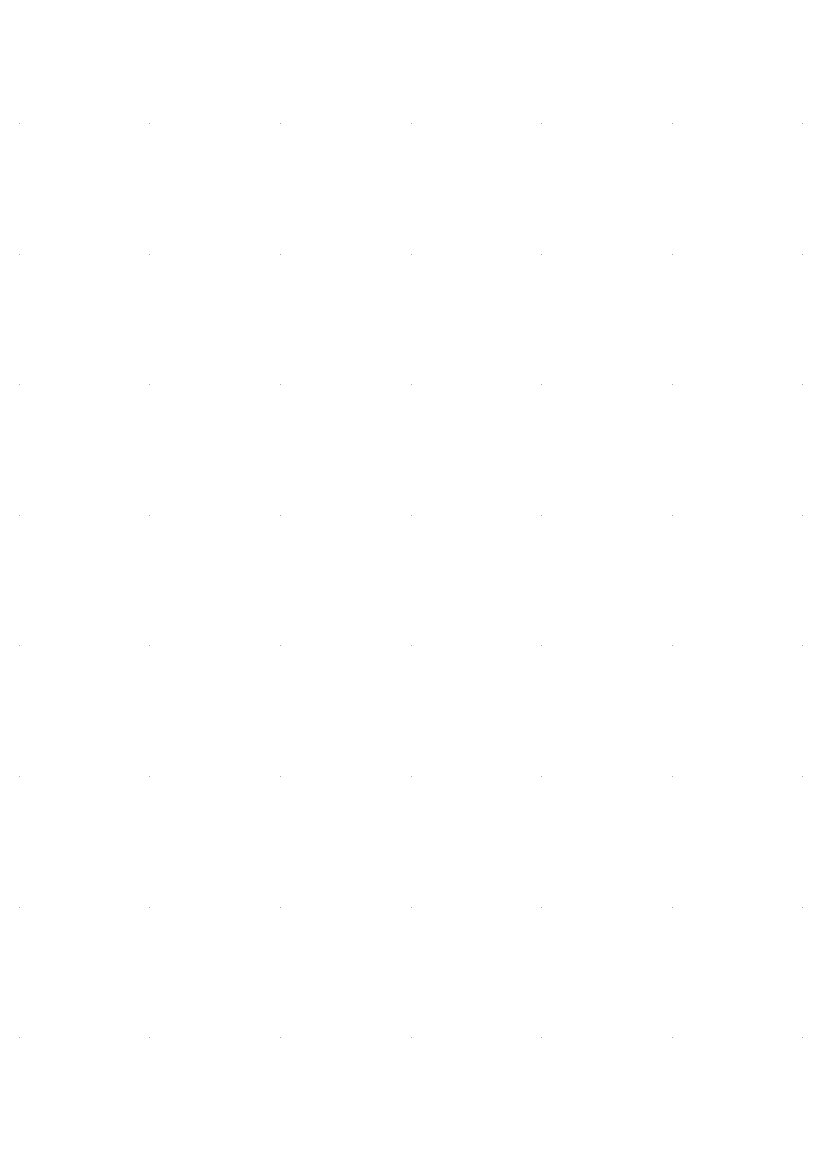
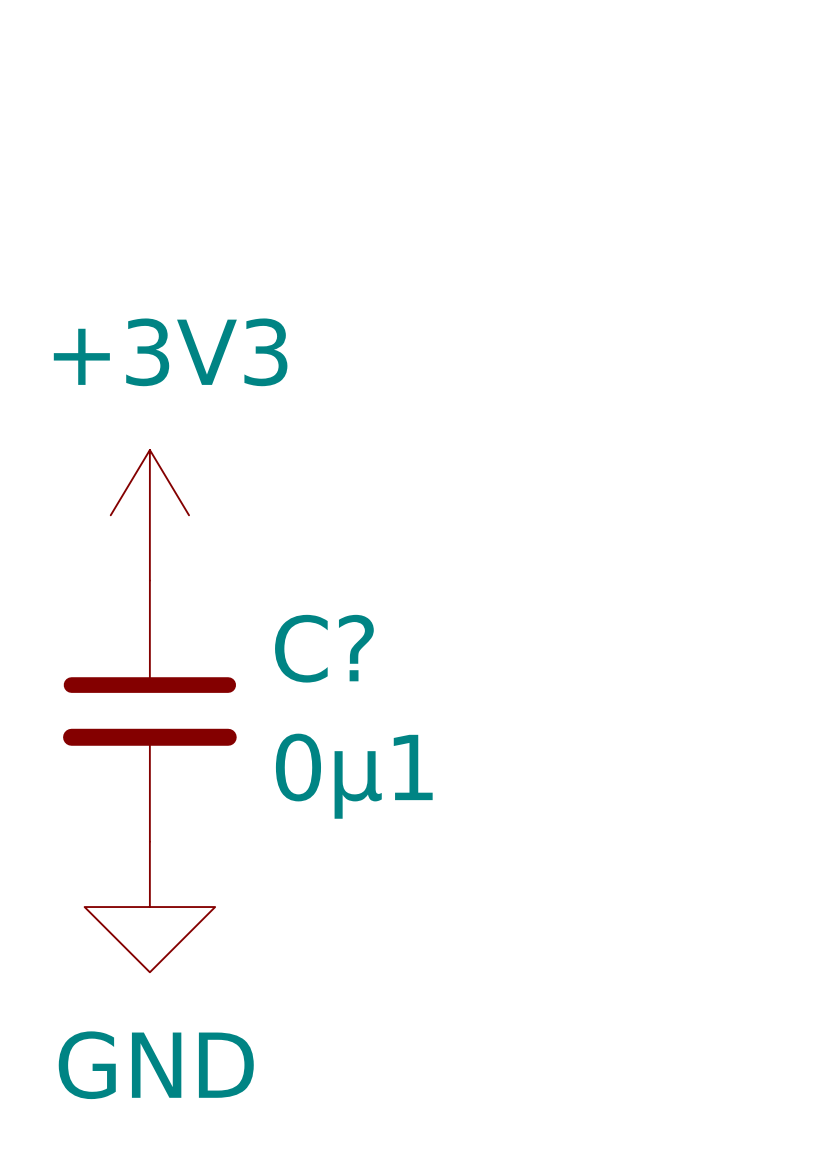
power symbol: none -> +3V3 (149, 515)
C?: none -> 0µ1 (149, 711)
power symbol: none -> GND (149, 907)

